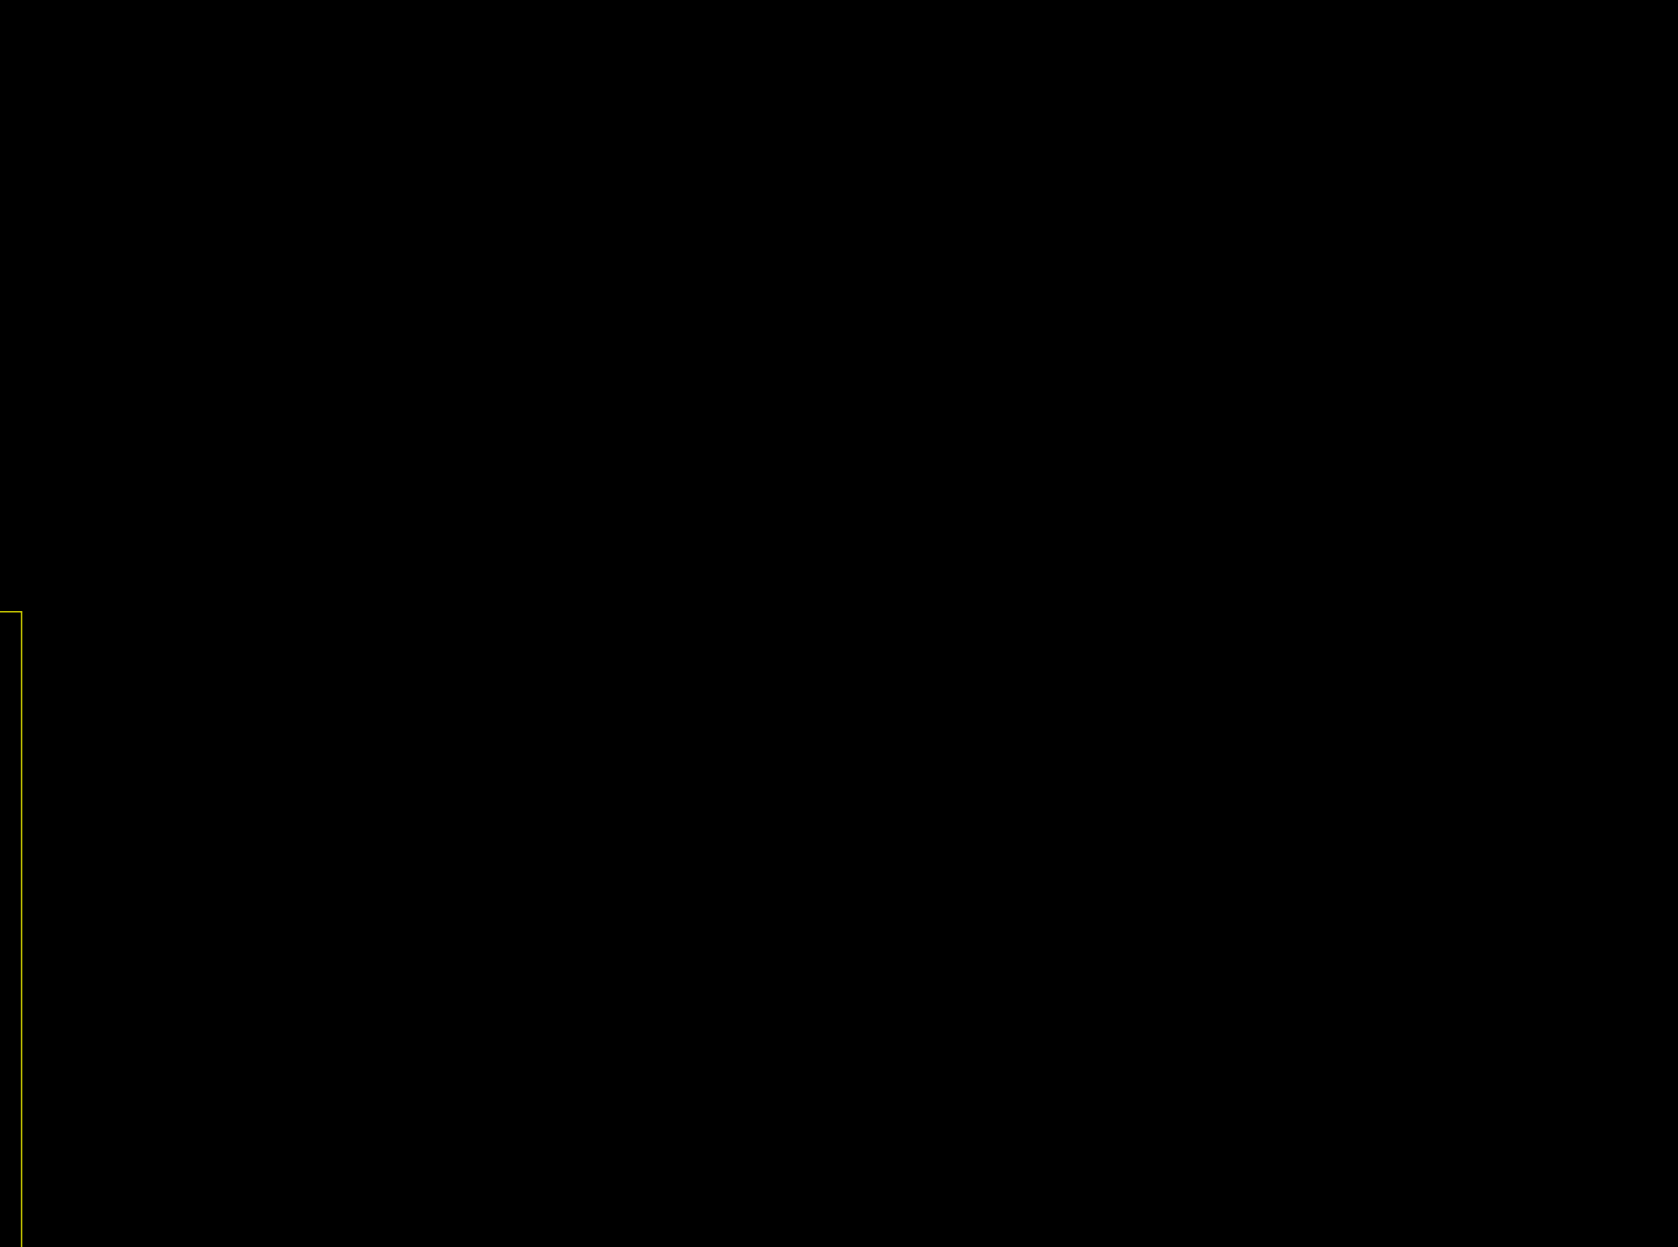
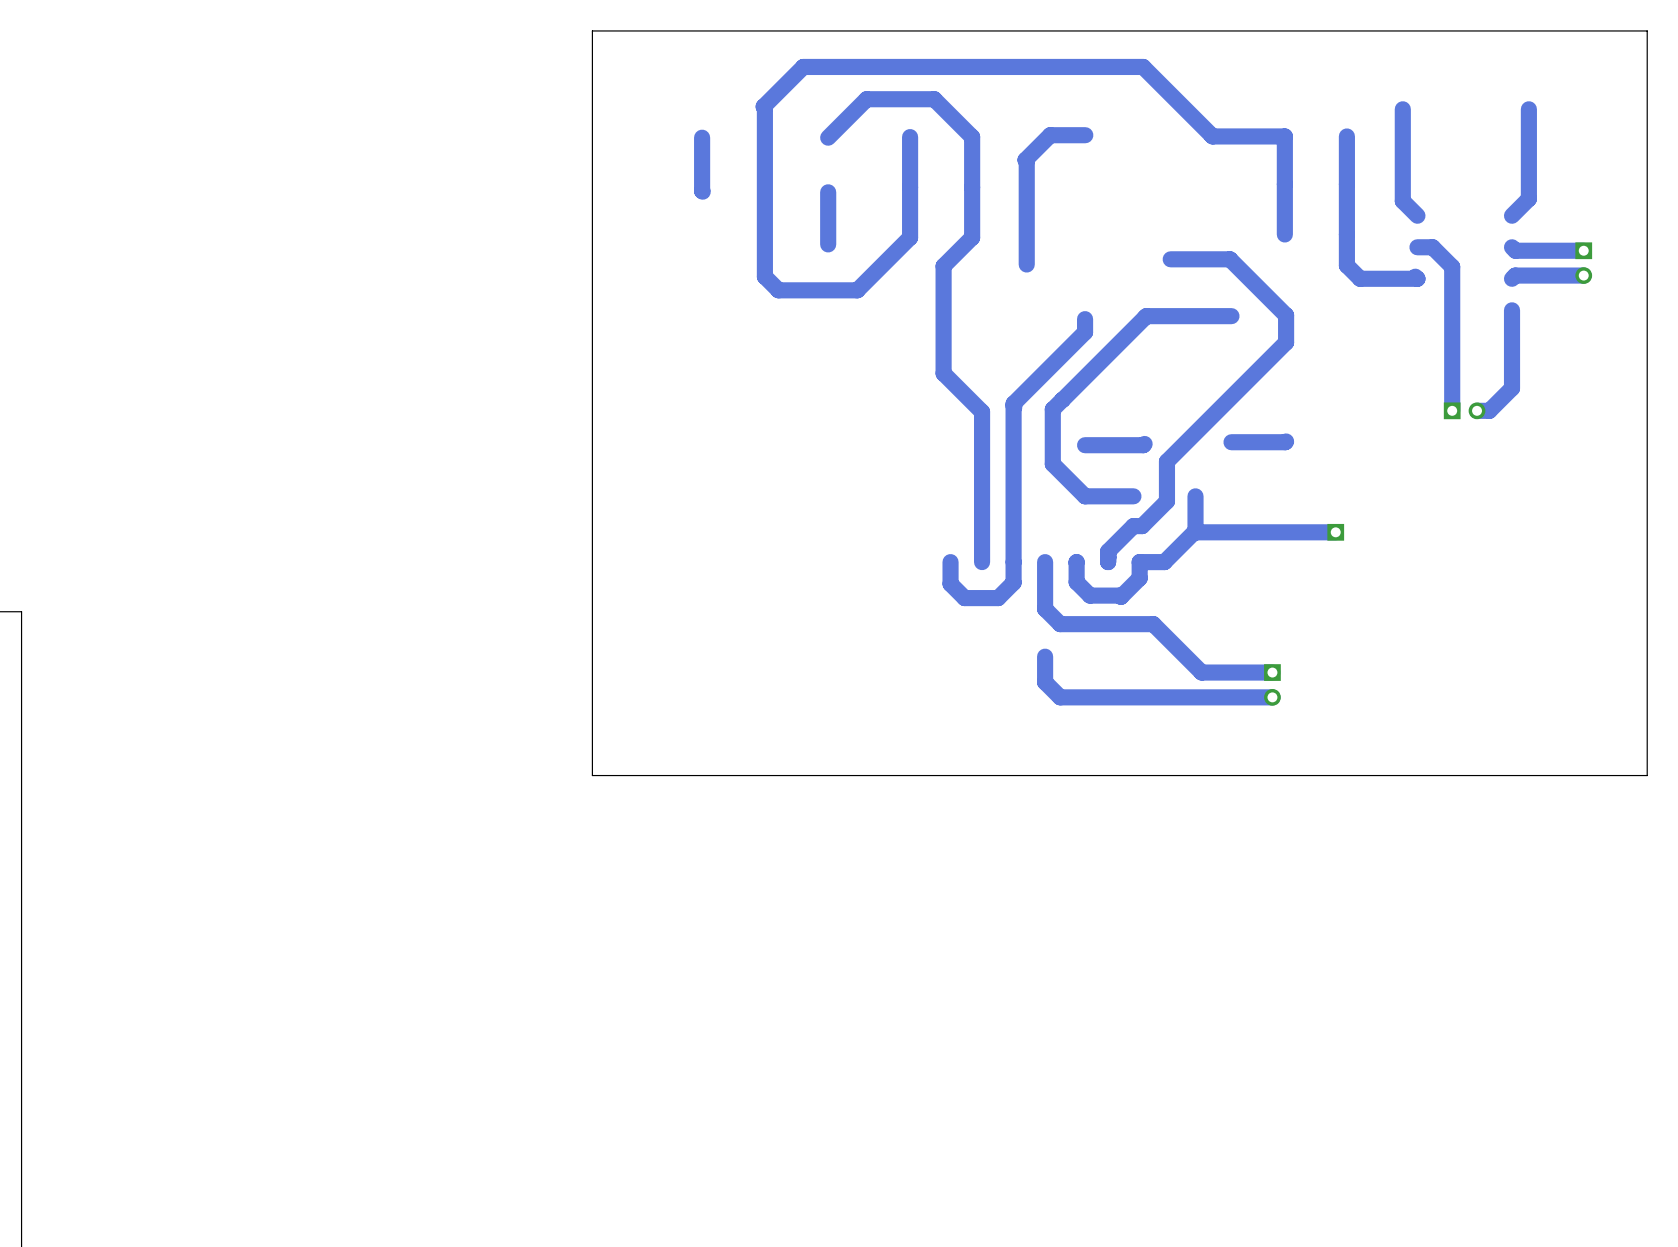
board edge: none -> (1647, 30) (592, 30) (592, 775) (1647, 775) (1647, 30)
bottom track: none -> (1402, 109) (1402, 201) (1417, 215)
bottom track: none -> (1528, 109) (1528, 198) (1512, 215)
bottom track: none -> (1085, 135) (1050, 135) (1025, 160) (1026, 264)
bottom track: none -> (1346, 136) (1346, 265) (1360, 278) (1417, 278) (1415, 276)
bottom track: none -> (702, 137) (702, 191)
bottom track: none -> (828, 137) (866, 99) (934, 99) (972, 137) (972, 237) (943, 266) (943, 373) (982, 411) (982, 562)
bottom track: none -> (910, 137) (910, 237) (857, 290) (778, 290) (764, 276) (763, 106) (803, 66) (1143, 66) (1212, 136) (1284, 136) (1284, 234)
bottom track: none -> (828, 192) (828, 244)
bottom track: none -> (1417, 247) (1432, 247) (1452, 266) (1452, 410)
bottom track: none -> (1512, 247) (1515, 250) (1583, 250)
bottom track: none -> (1170, 259) (1230, 259) (1286, 315) (1286, 342) (1166, 461) (1166, 501) (1142, 526) (1133, 526) (1108, 551) (1108, 562)
part: none -> (1583, 263)
bottom track: none -> (1583, 275) (1515, 275) (1512, 278)
bottom track: none -> (1512, 310) (1512, 388) (1489, 410) (1477, 410)
bottom track: none -> (1231, 316) (1146, 316) (1062, 399)
bottom track: none -> (1085, 319) (1085, 332) (1013, 403) (1013, 582) (998, 598) (964, 598) (950, 583) (950, 562)
bottom track: none -> (1062, 399) (1052, 409) (1052, 464) (1085, 496) (1133, 496)
part: none -> (1464, 410)
bottom track: none -> (1286, 441) (1231, 442)
bottom track: none -> (1144, 443) (1085, 445)
bottom track: none -> (1195, 496) (1195, 531)
bottom track: none -> (1195, 531) (1164, 562) (1139, 562) (1139, 578) (1121, 596) (1090, 595) (1076, 582) (1076, 562)
bottom track: none -> (1195, 531) (1335, 532)
part: none -> (1335, 532)
bottom track: none -> (1045, 562) (1045, 609) (1060, 624) (1153, 624) (1201, 672) (1272, 672)
bottom track: none -> (1045, 656) (1045, 682) (1060, 697) (1272, 697)
part: none -> (1272, 684)

